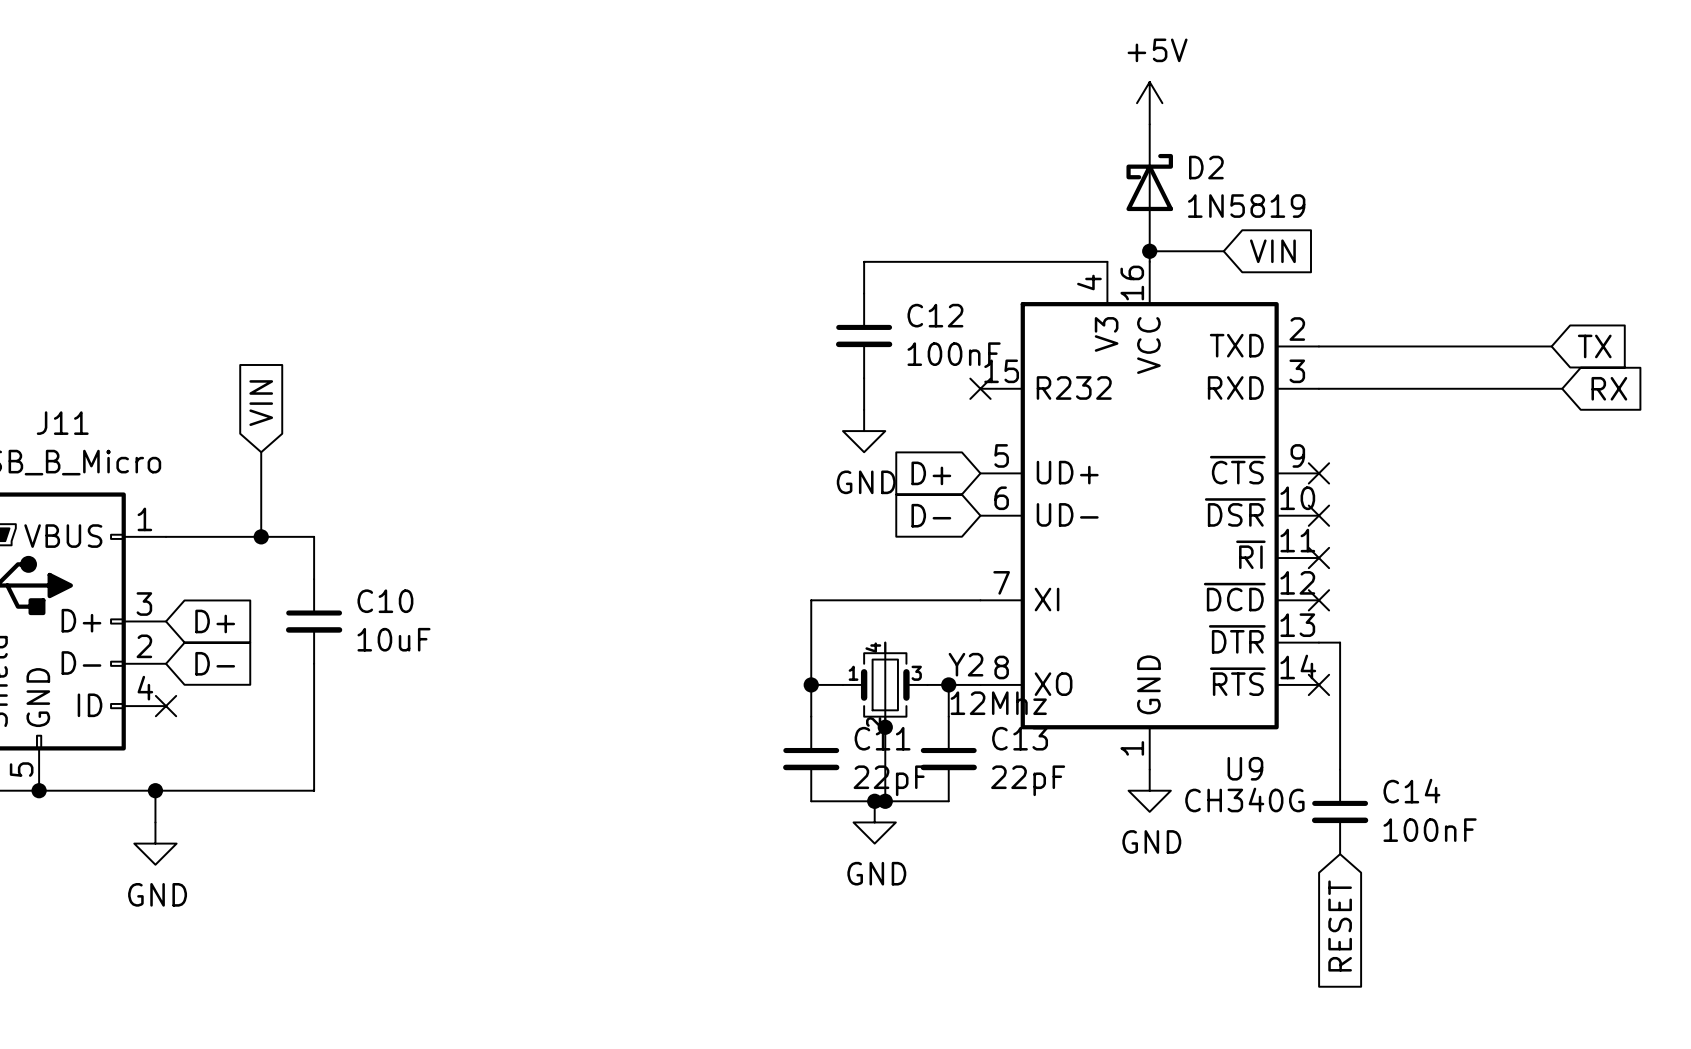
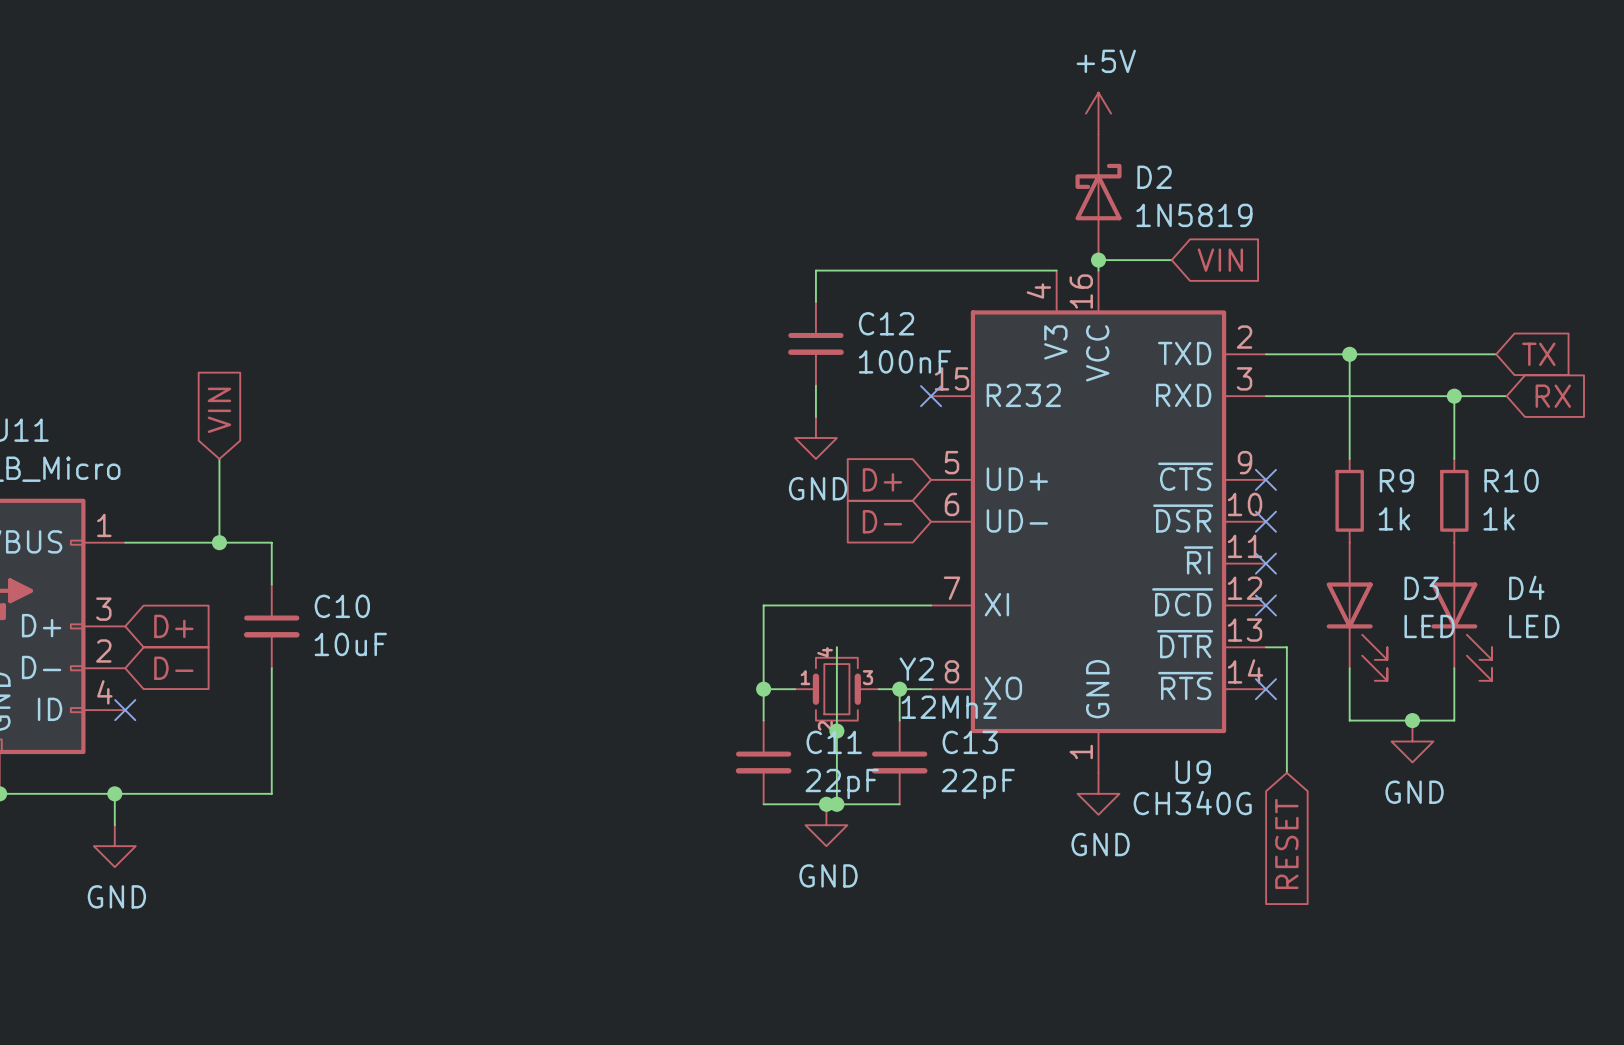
wire: none -> (1349, 354) (1349, 458)
junction: none -> (1349, 354)
wire: none -> (1454, 396) (1454, 458)
junction: none -> (1454, 396)
R9: none -> 1k (1349, 500)
R10: none -> 1k (1454, 500)
D3: none -> LED (1357, 611)
D4: none -> LED (1461, 611)
wire: none -> (1349, 668) (1349, 720) (1454, 720) (1454, 668)
junction: none -> (1412, 720)
power symbol: none -> GND (1412, 741)
C14: 100nF (1340, 811) -> none
global label position: RESET (1340, 925) -> RESET (1286, 843)

